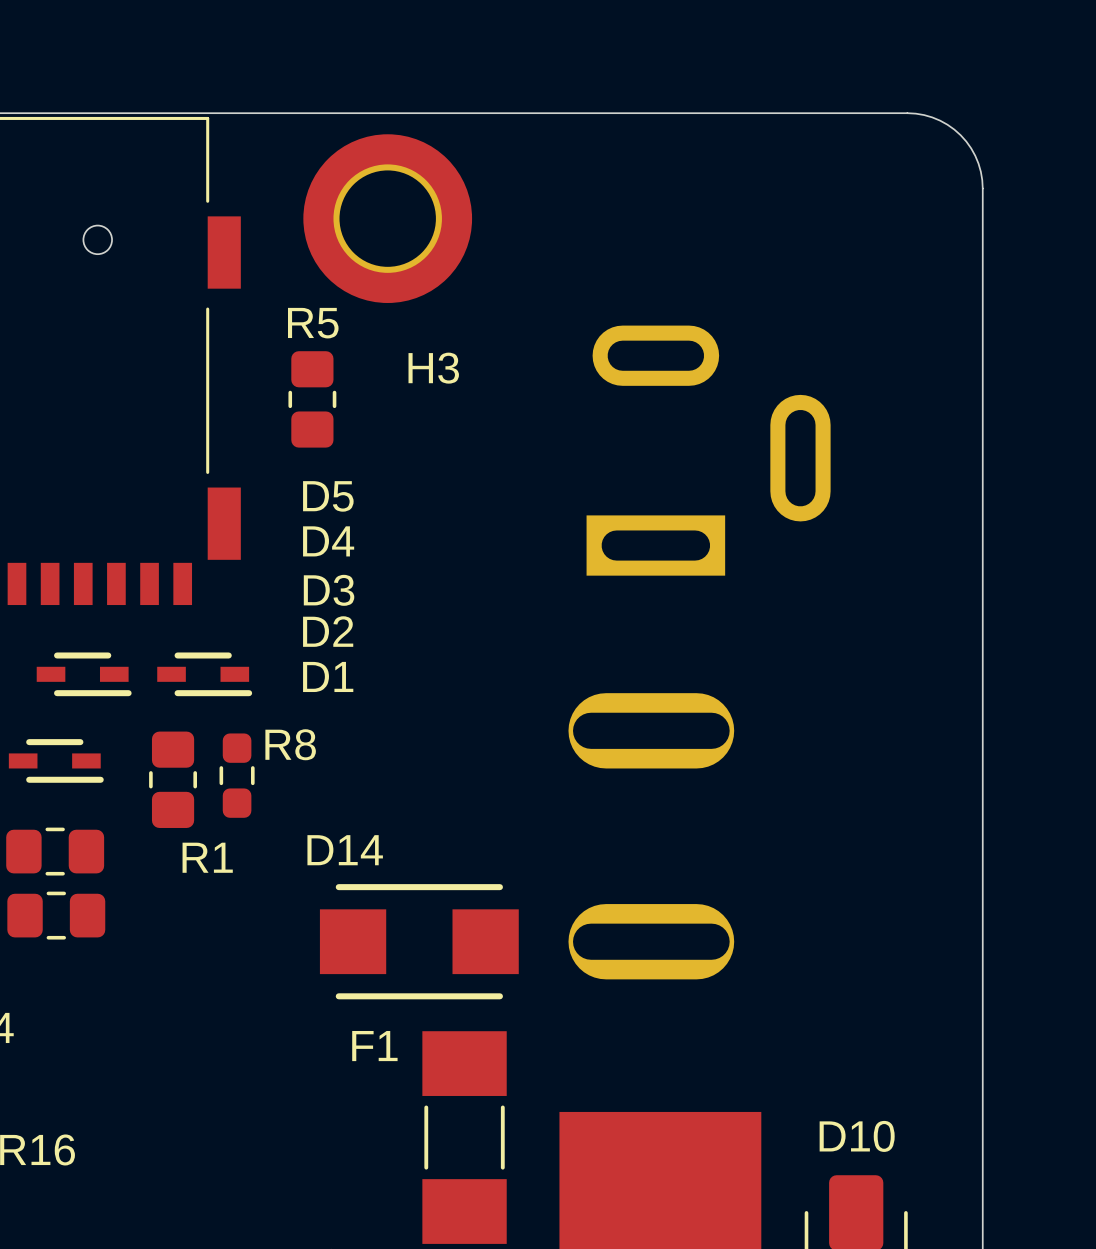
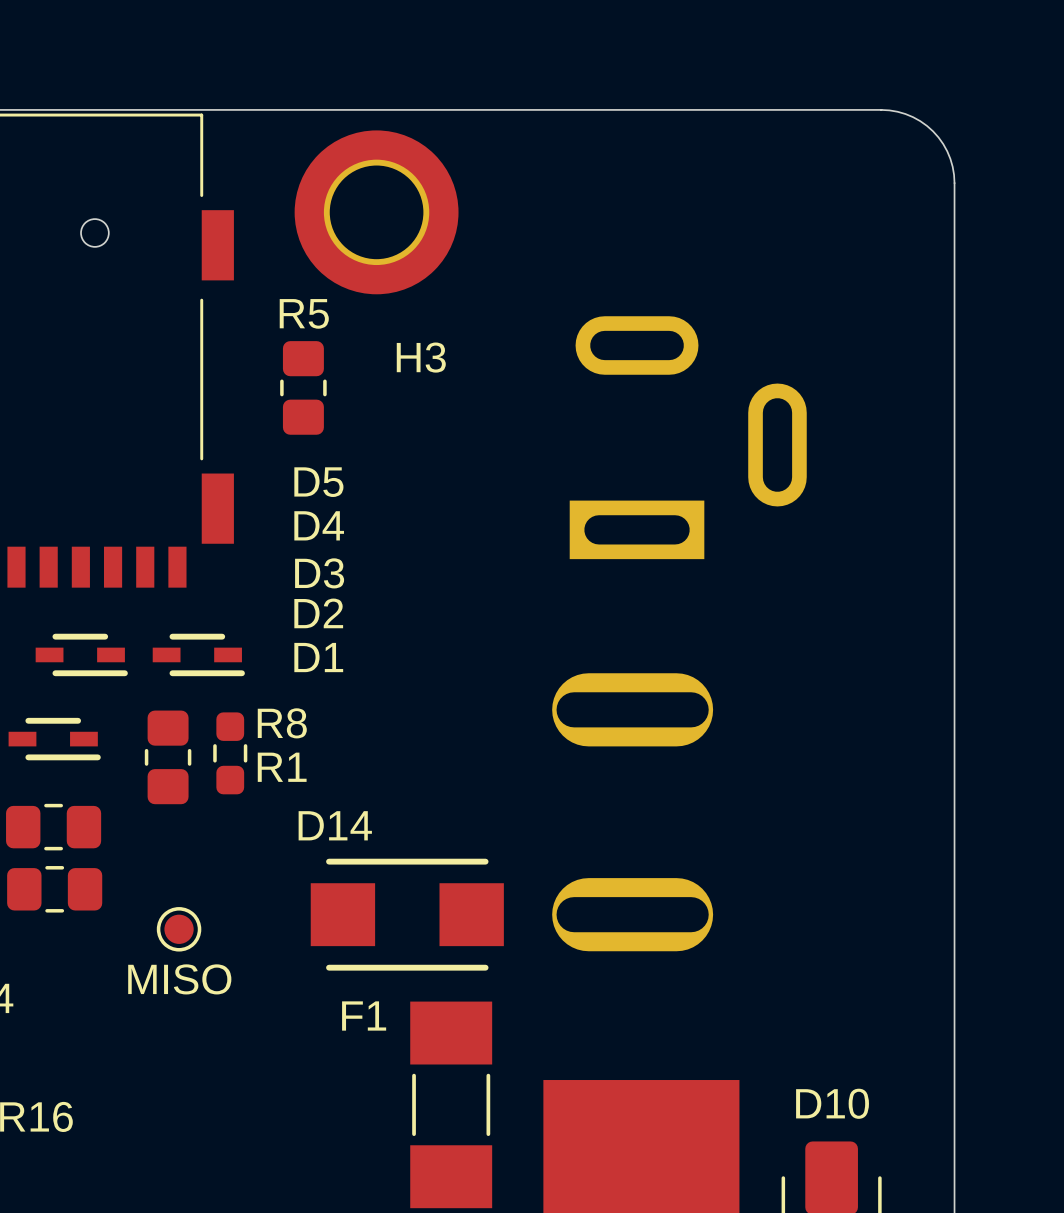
R1 name position: R1 (207, 857) -> R1 (282, 767)
part: none -> MISO (179, 929)

